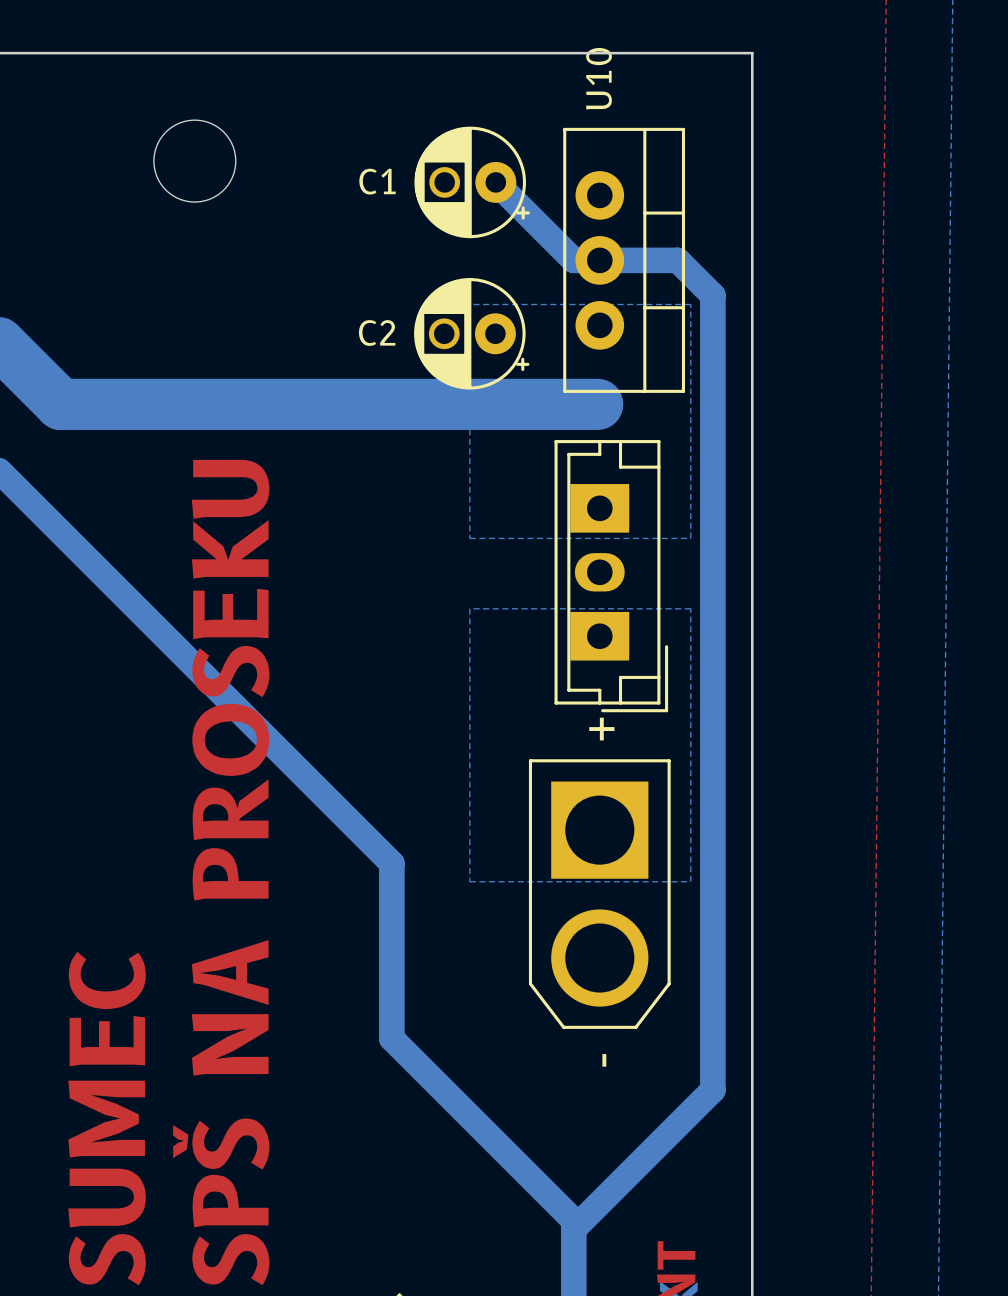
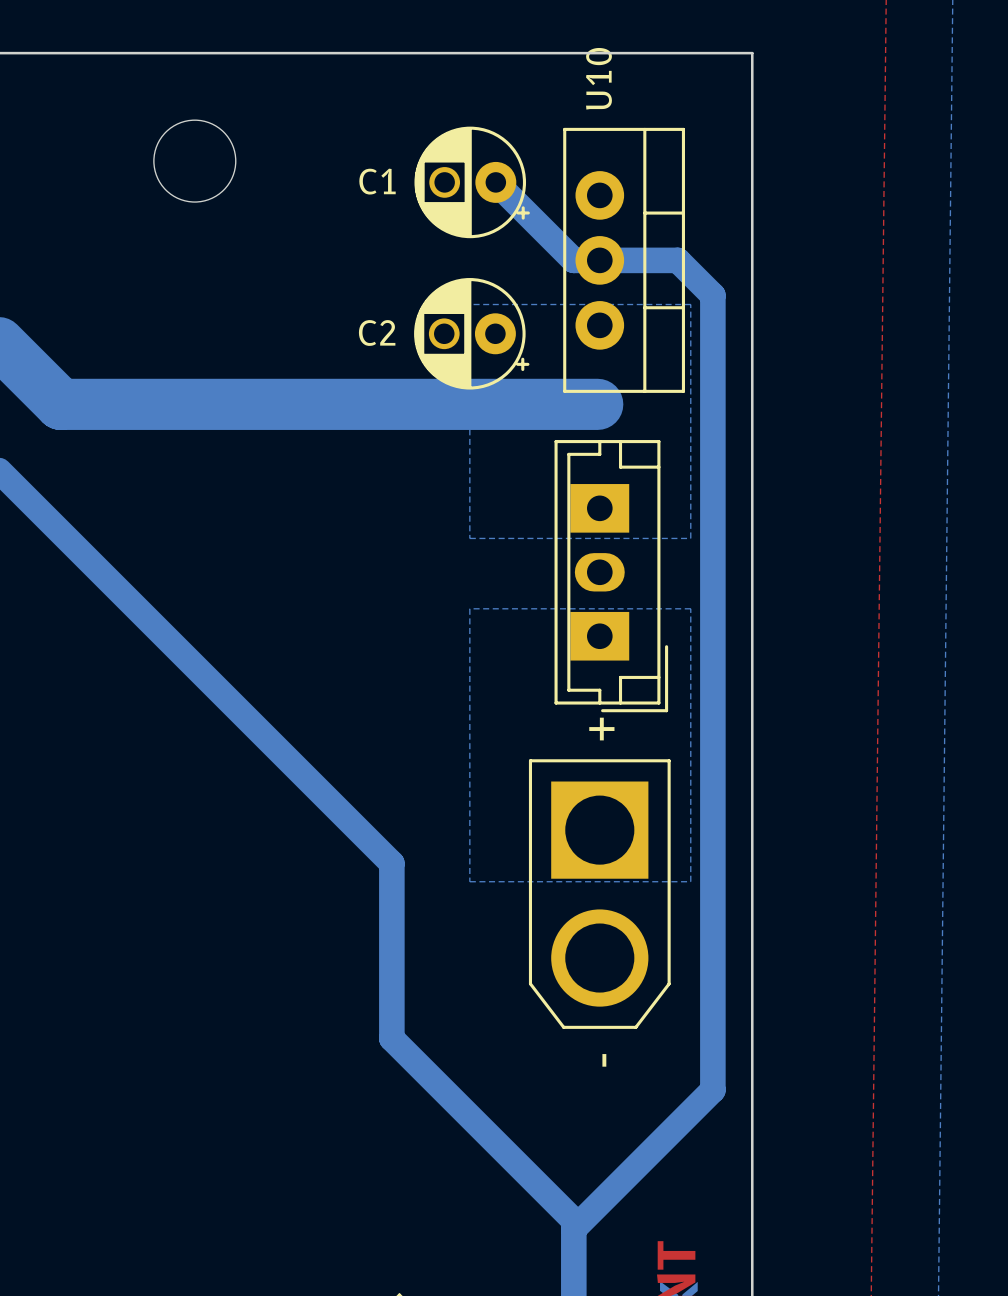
text: SPŠ NA PROSEKU (221, 872) -> none
text: SUMEC (107, 1118) -> none

